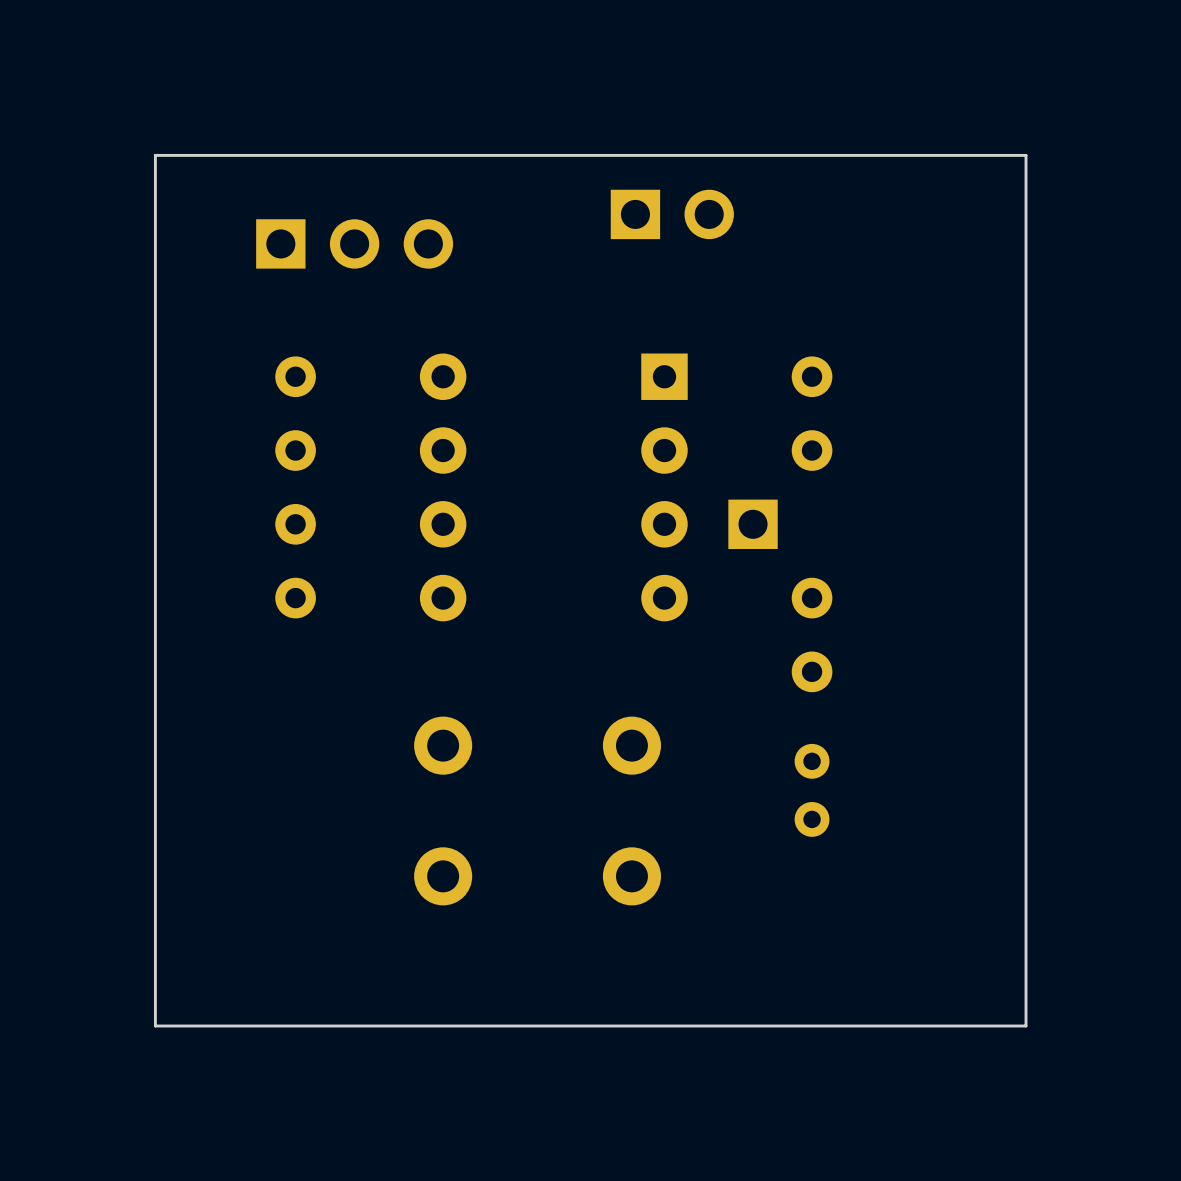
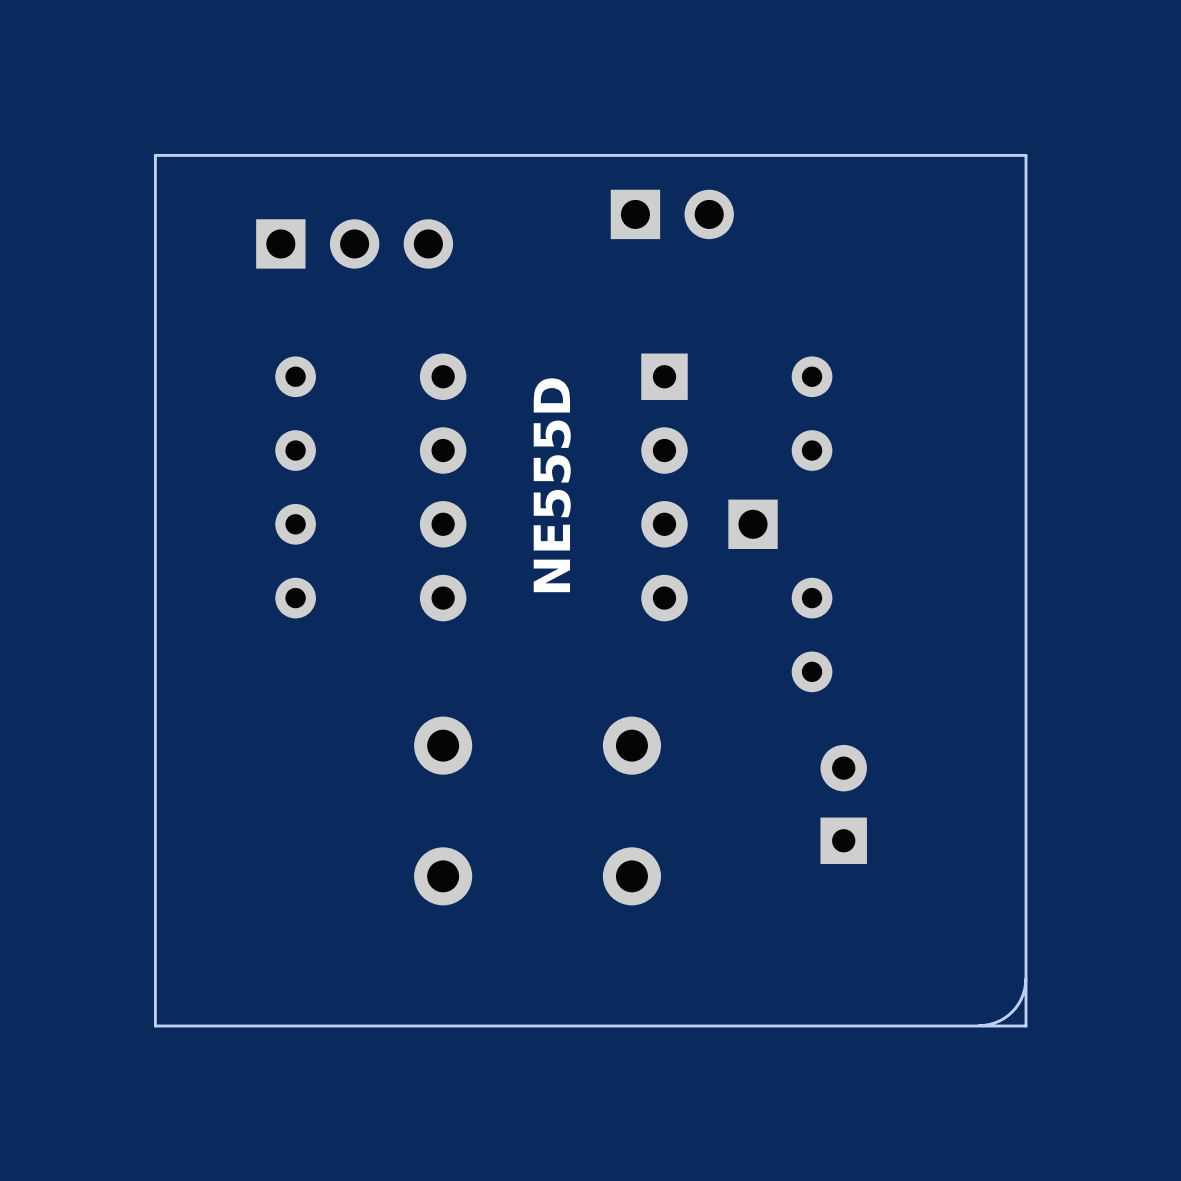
text: none -> NE555D (552, 485)
part: (812, 790) -> none
part: none -> (843, 804)
board edge: none -> (1025, 979) (1023, 994) (1012, 1012) (999, 1021) (979, 1025)

